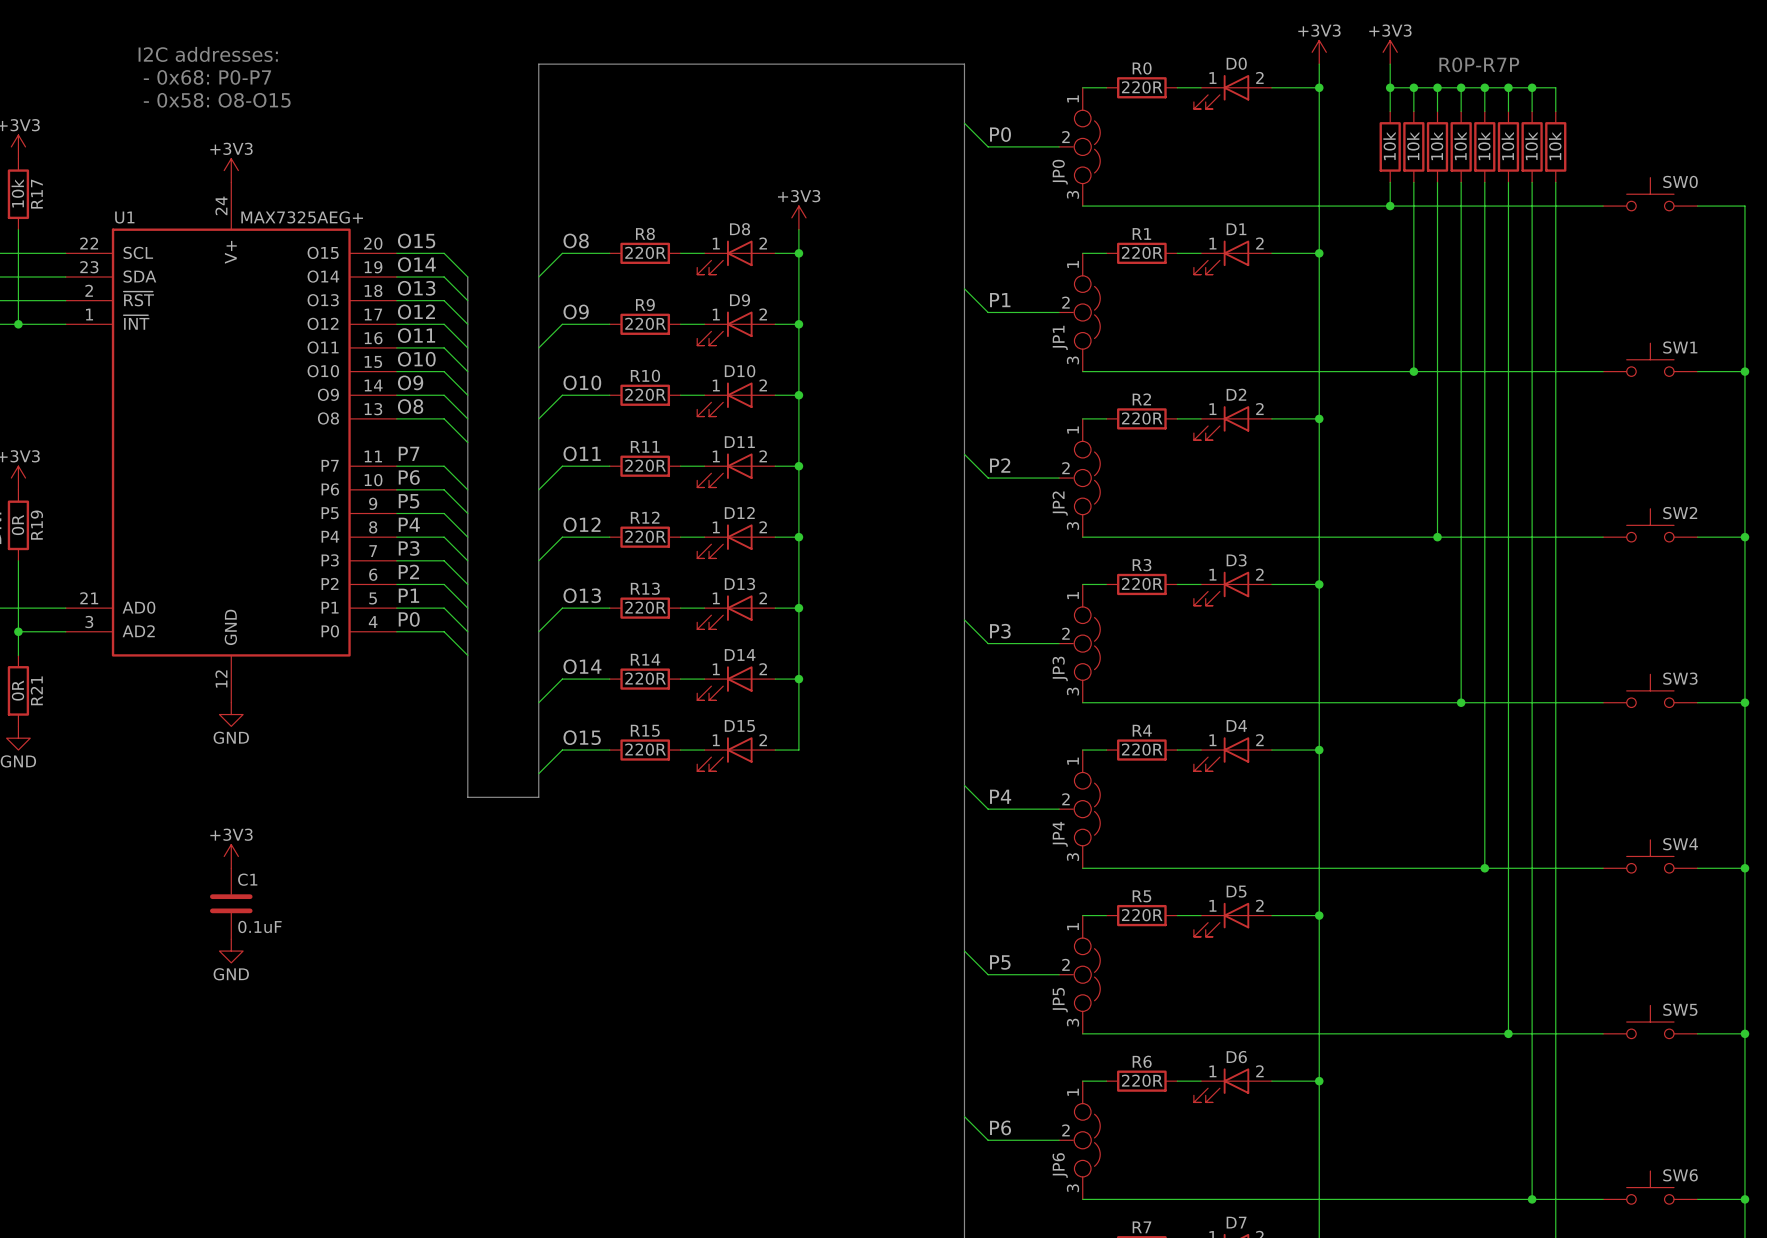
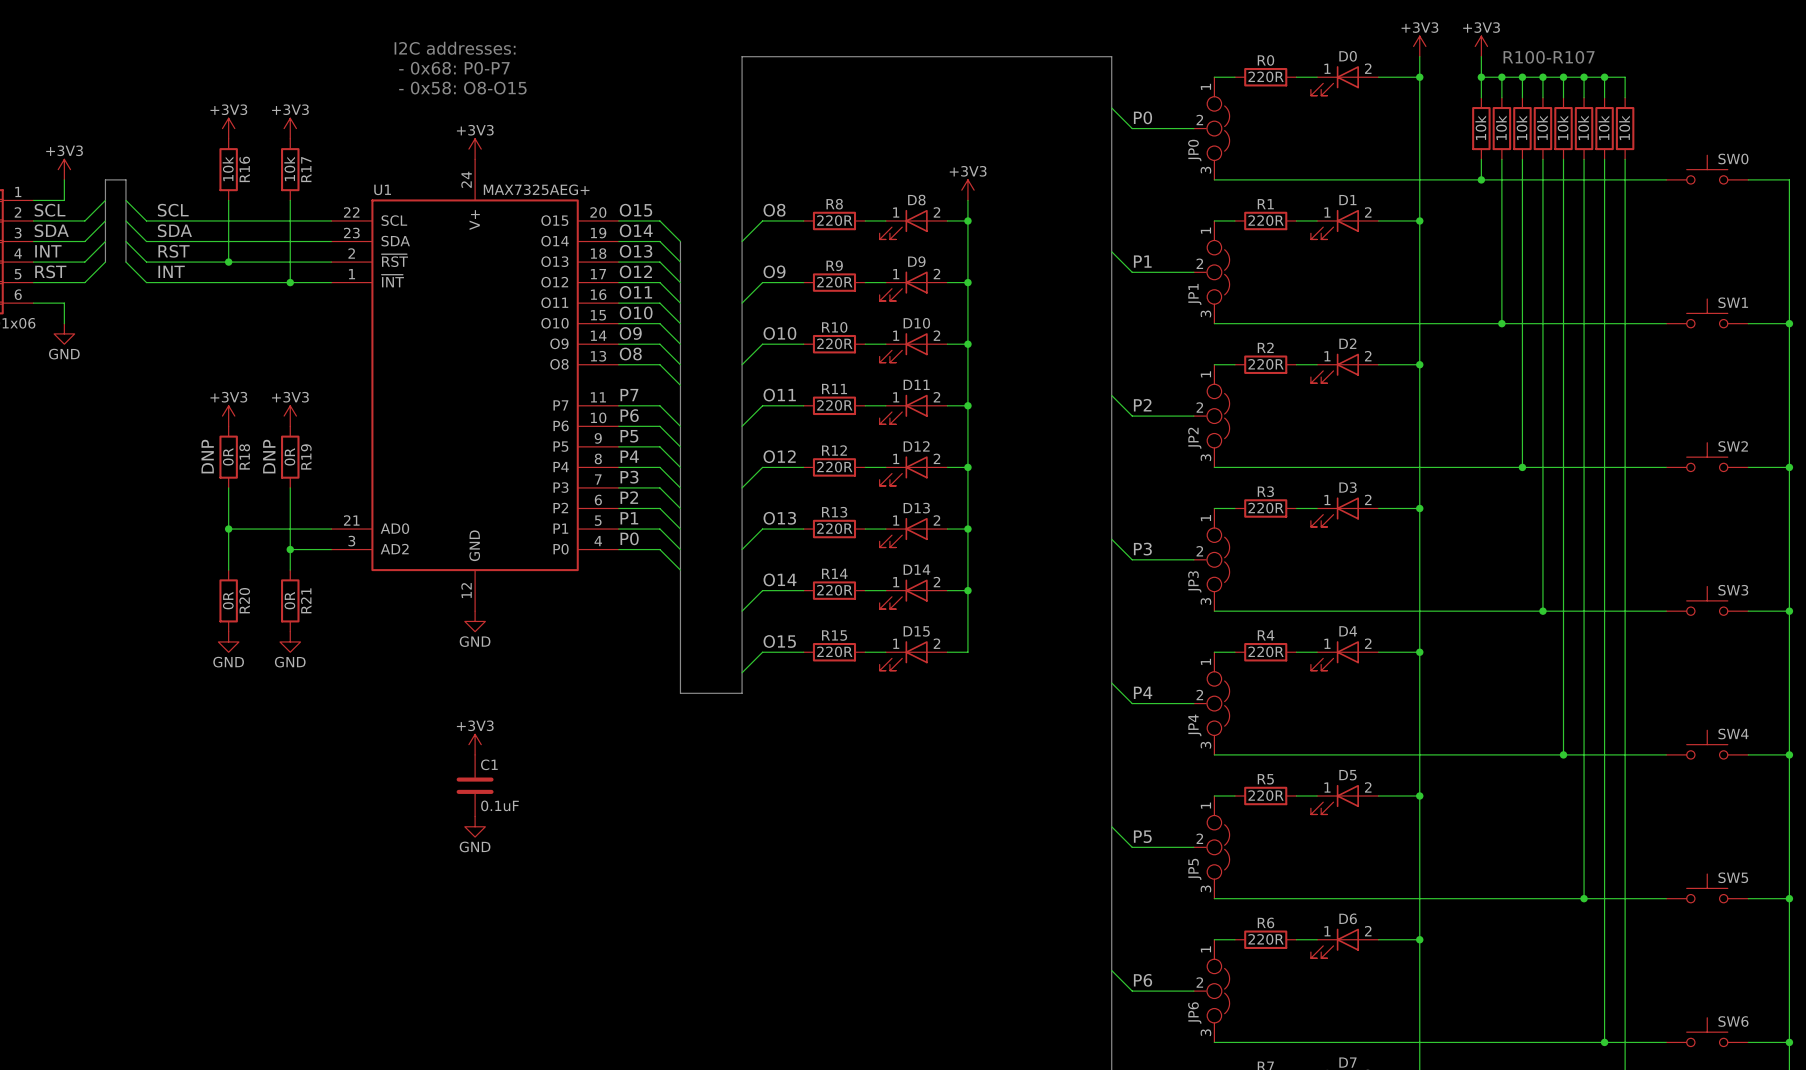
text: R0P-R7P (1479, 64) -> R100-R107 (1549, 57)

